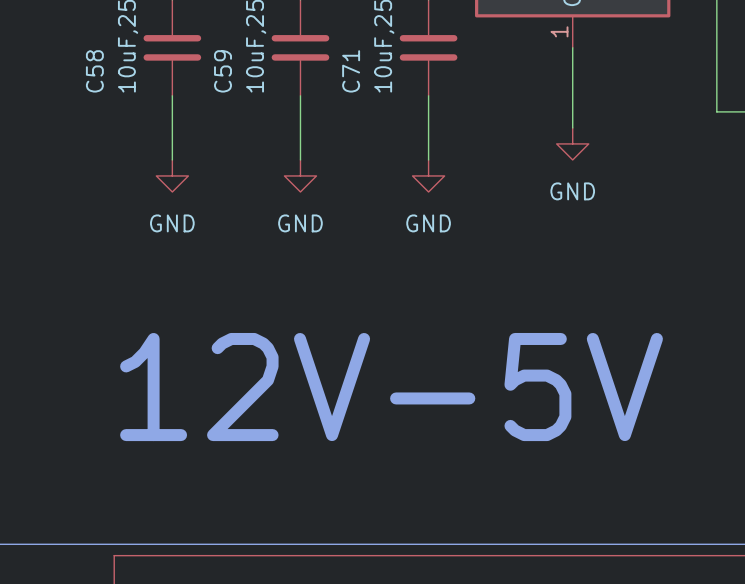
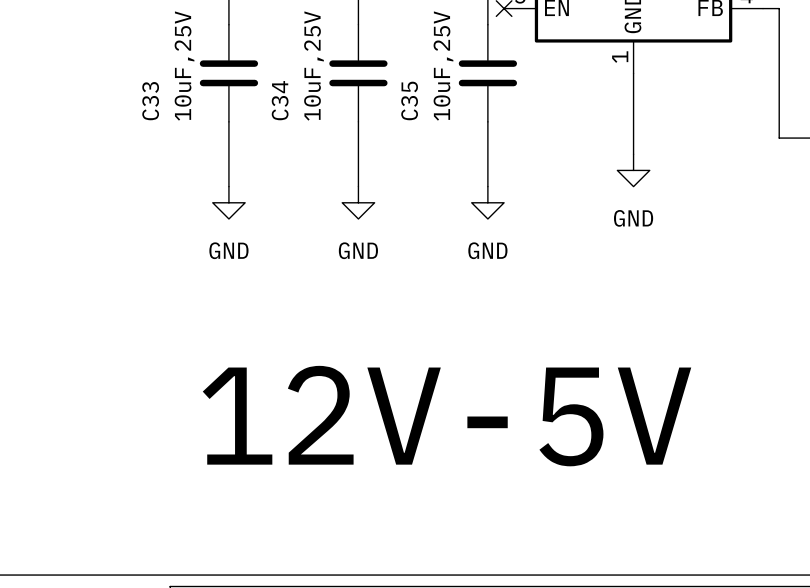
C58 name: C58 (94, 71) -> C33 (150, 101)
C59 name: C59 (223, 71) -> C34 (280, 100)
C71 name: C71 (351, 71) -> C35 (409, 100)

